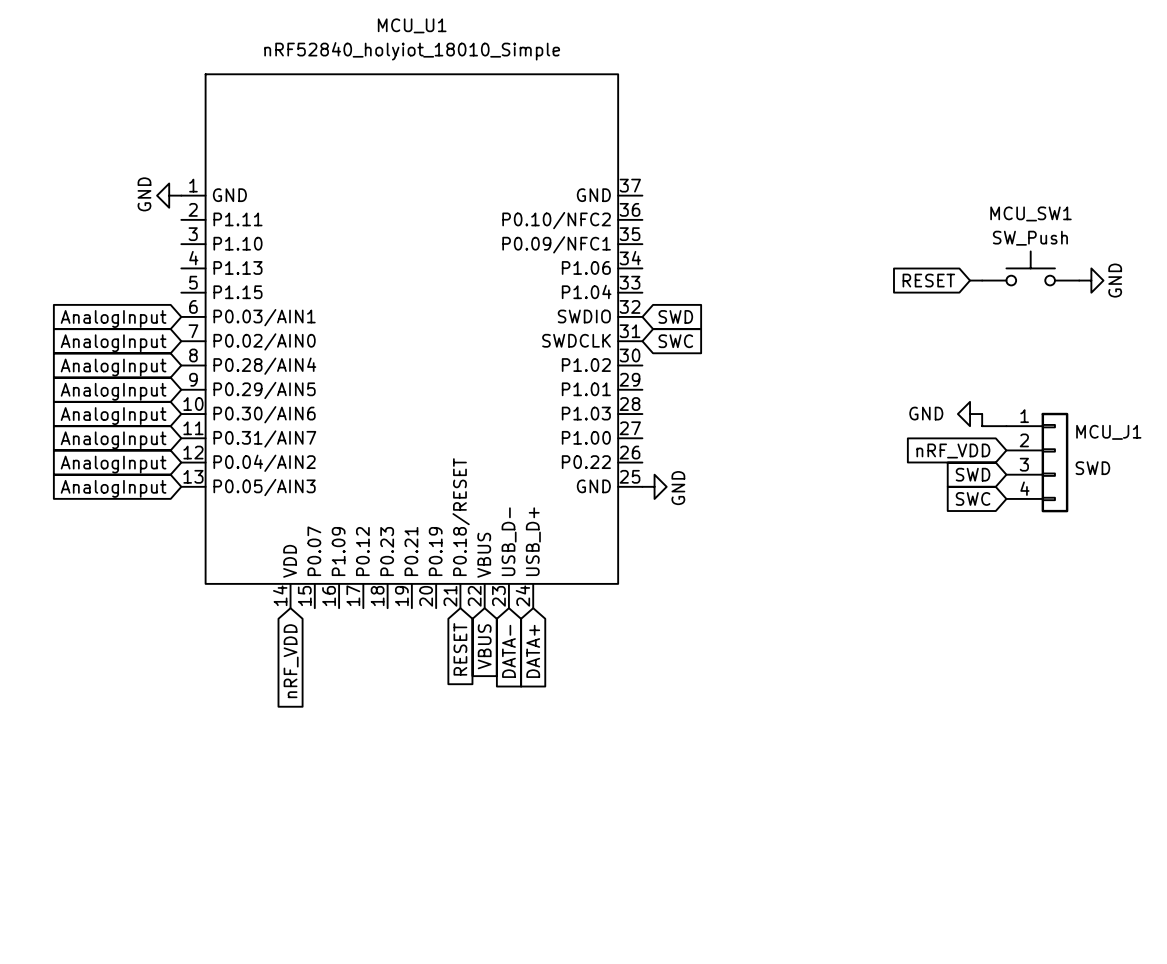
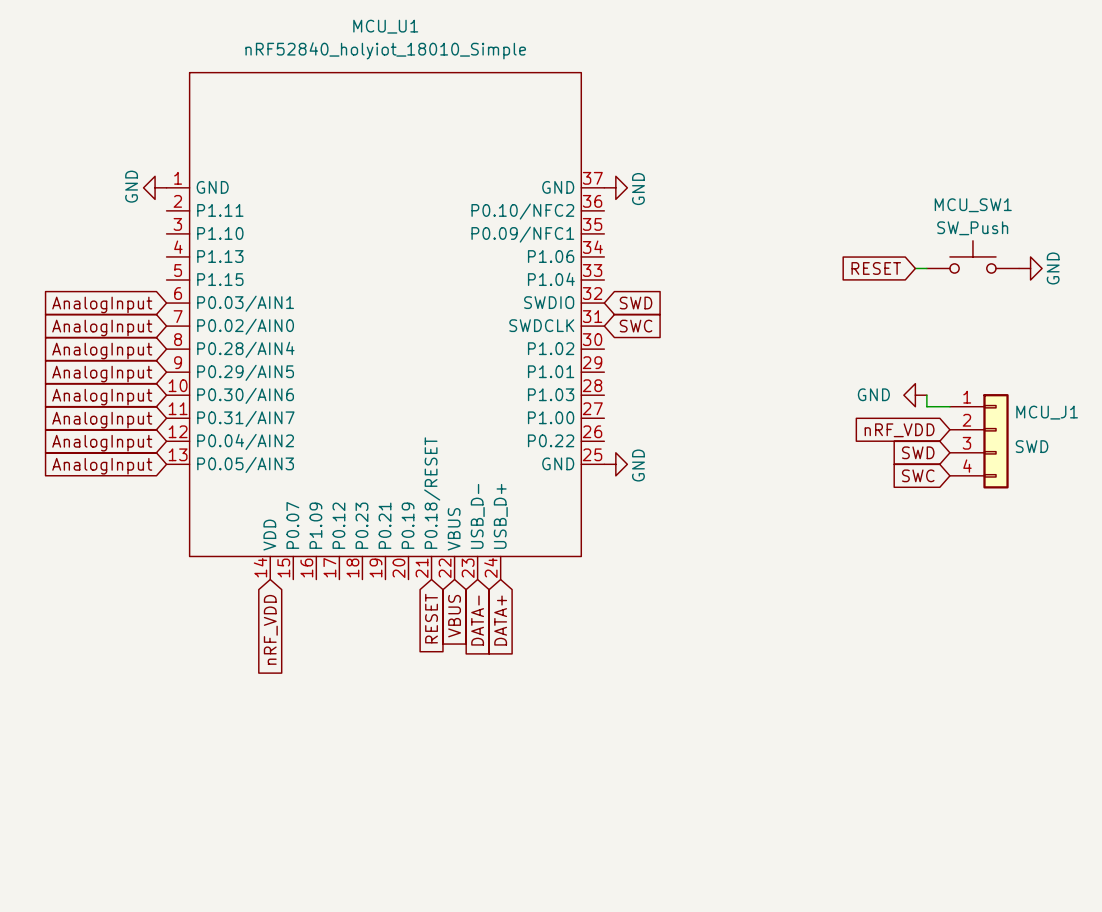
power symbol: none -> GND (615, 187)

